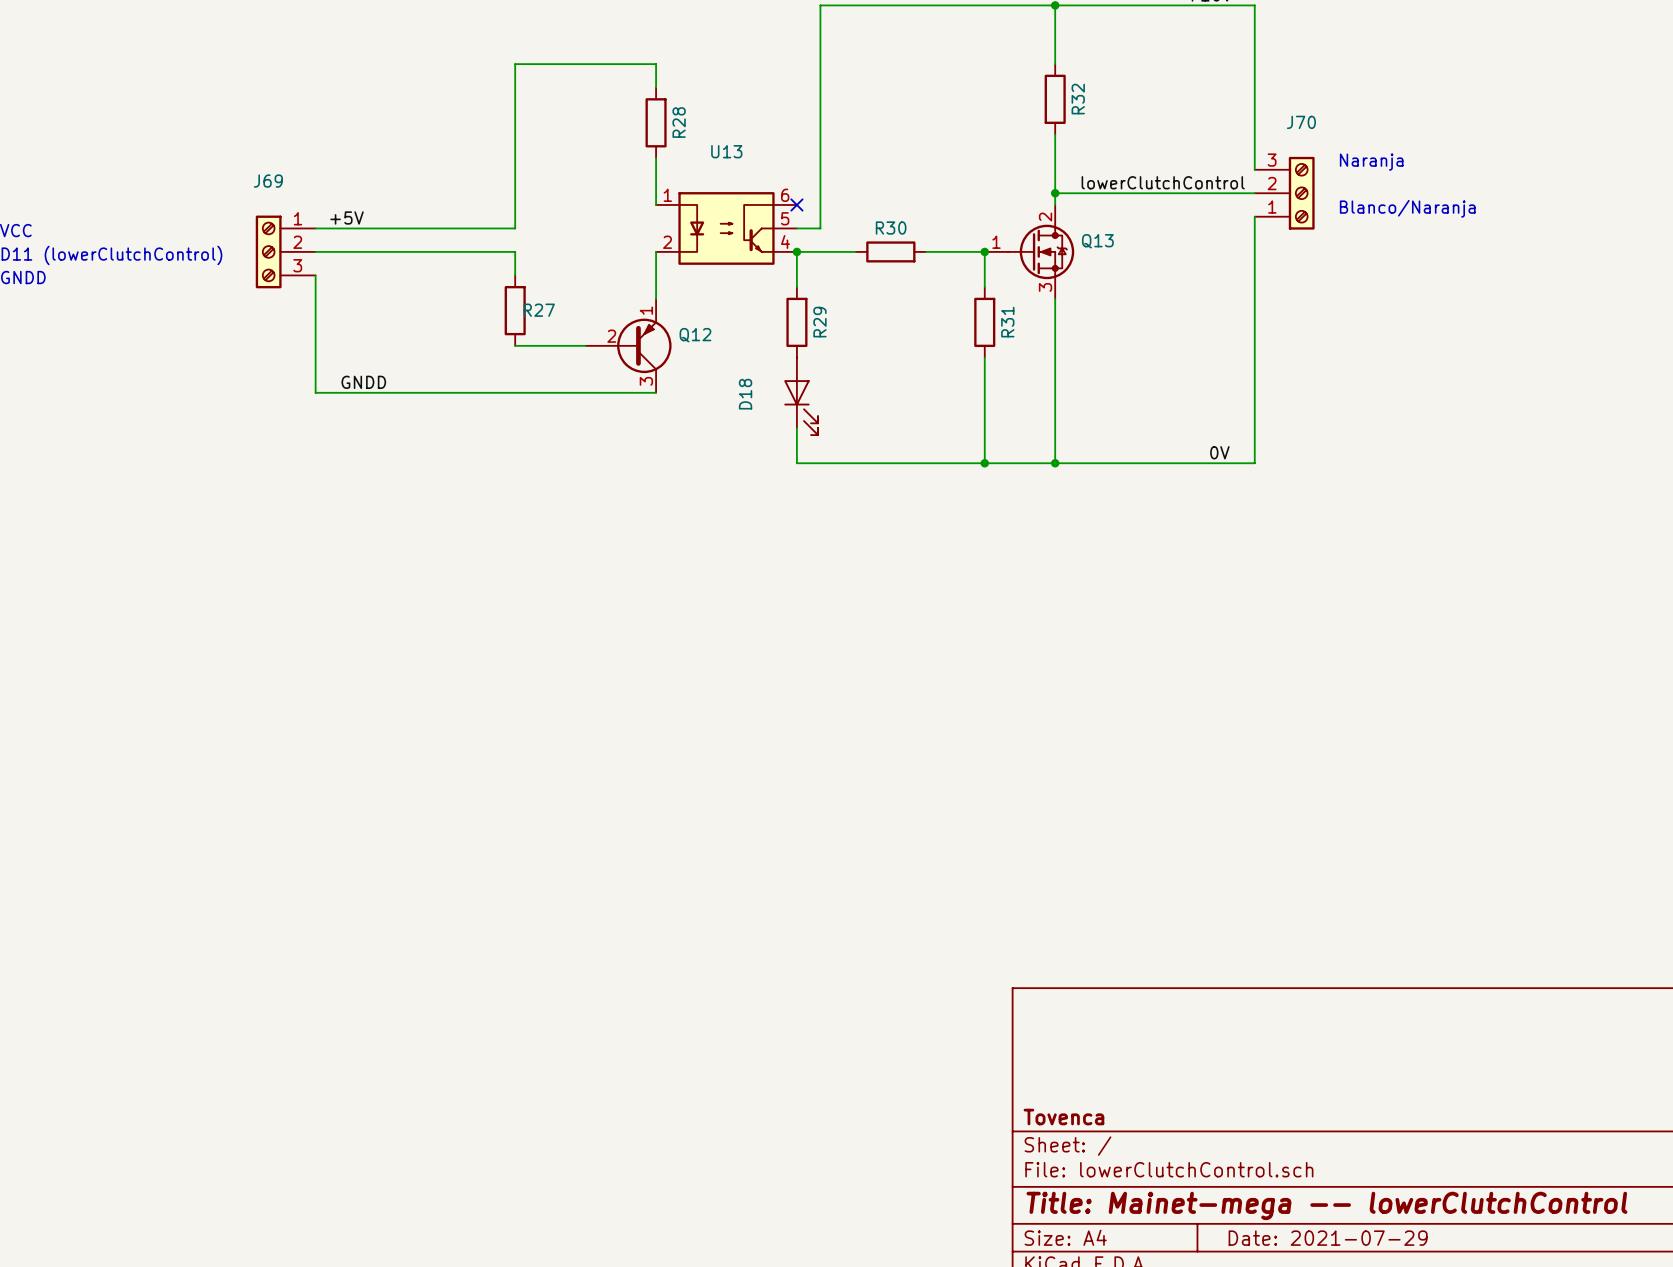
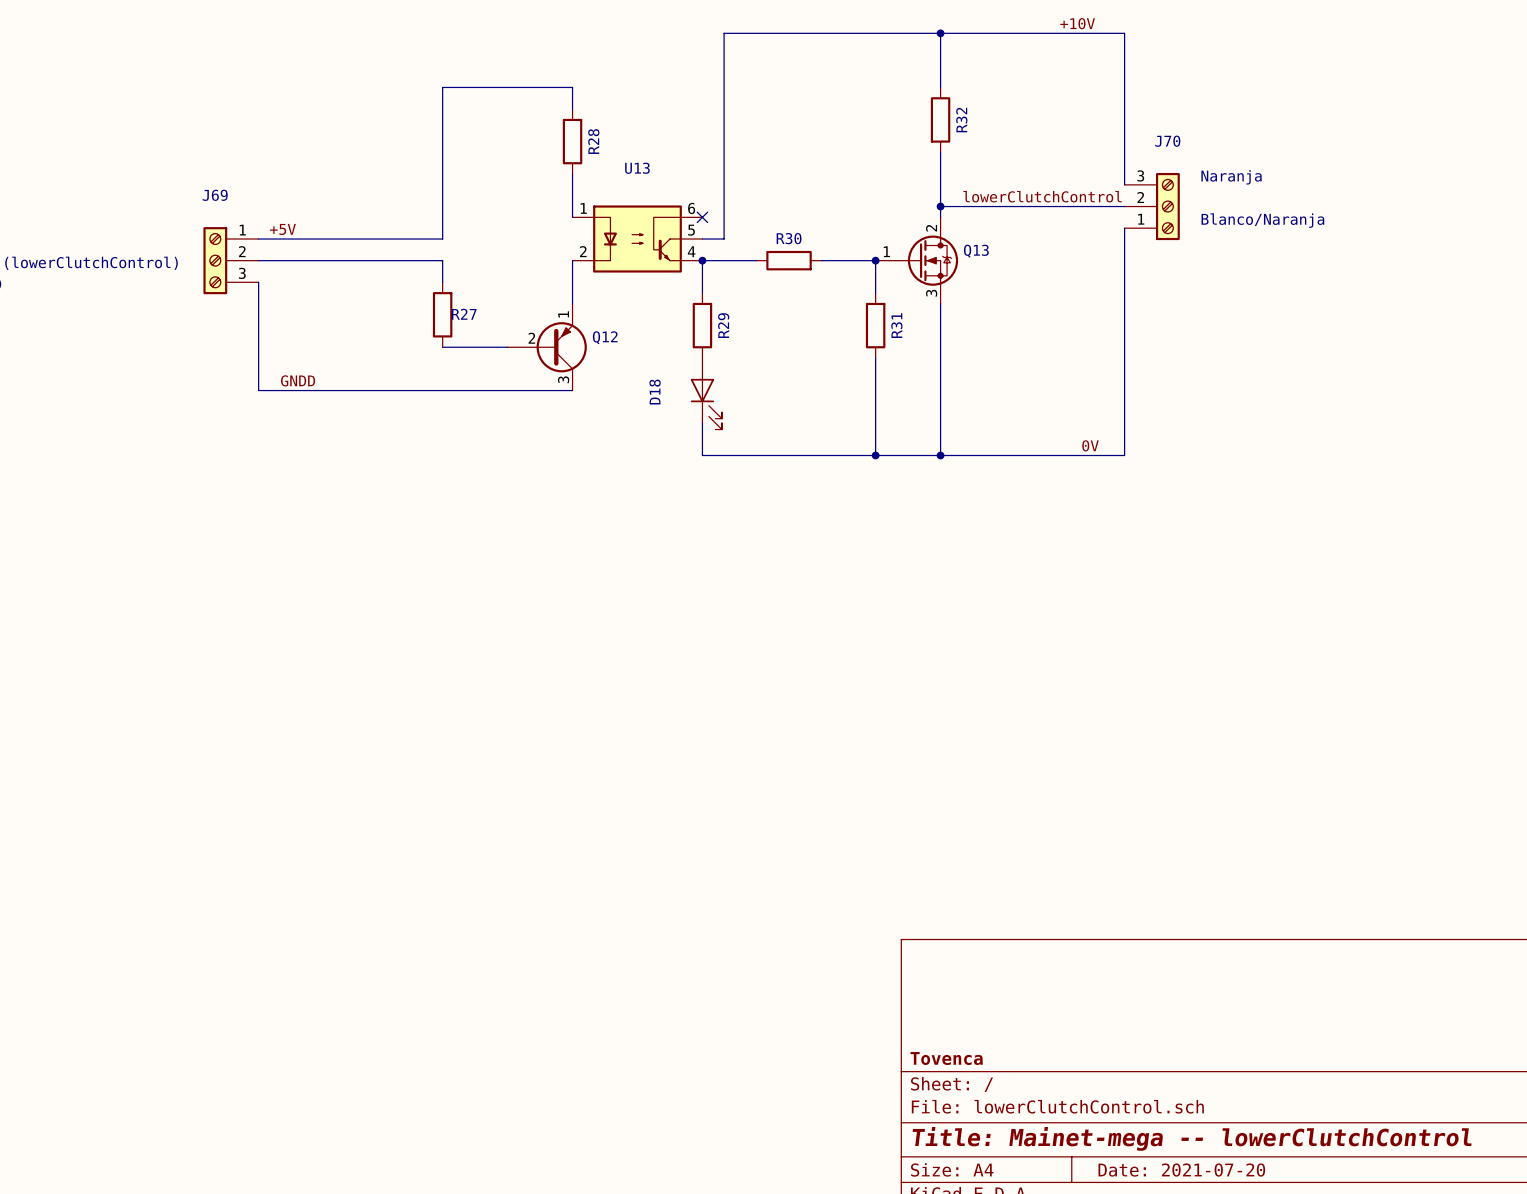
title block: Date: 2021-07-29 (1328, 1238) -> Date: 2021-07-20 (1181, 1170)

